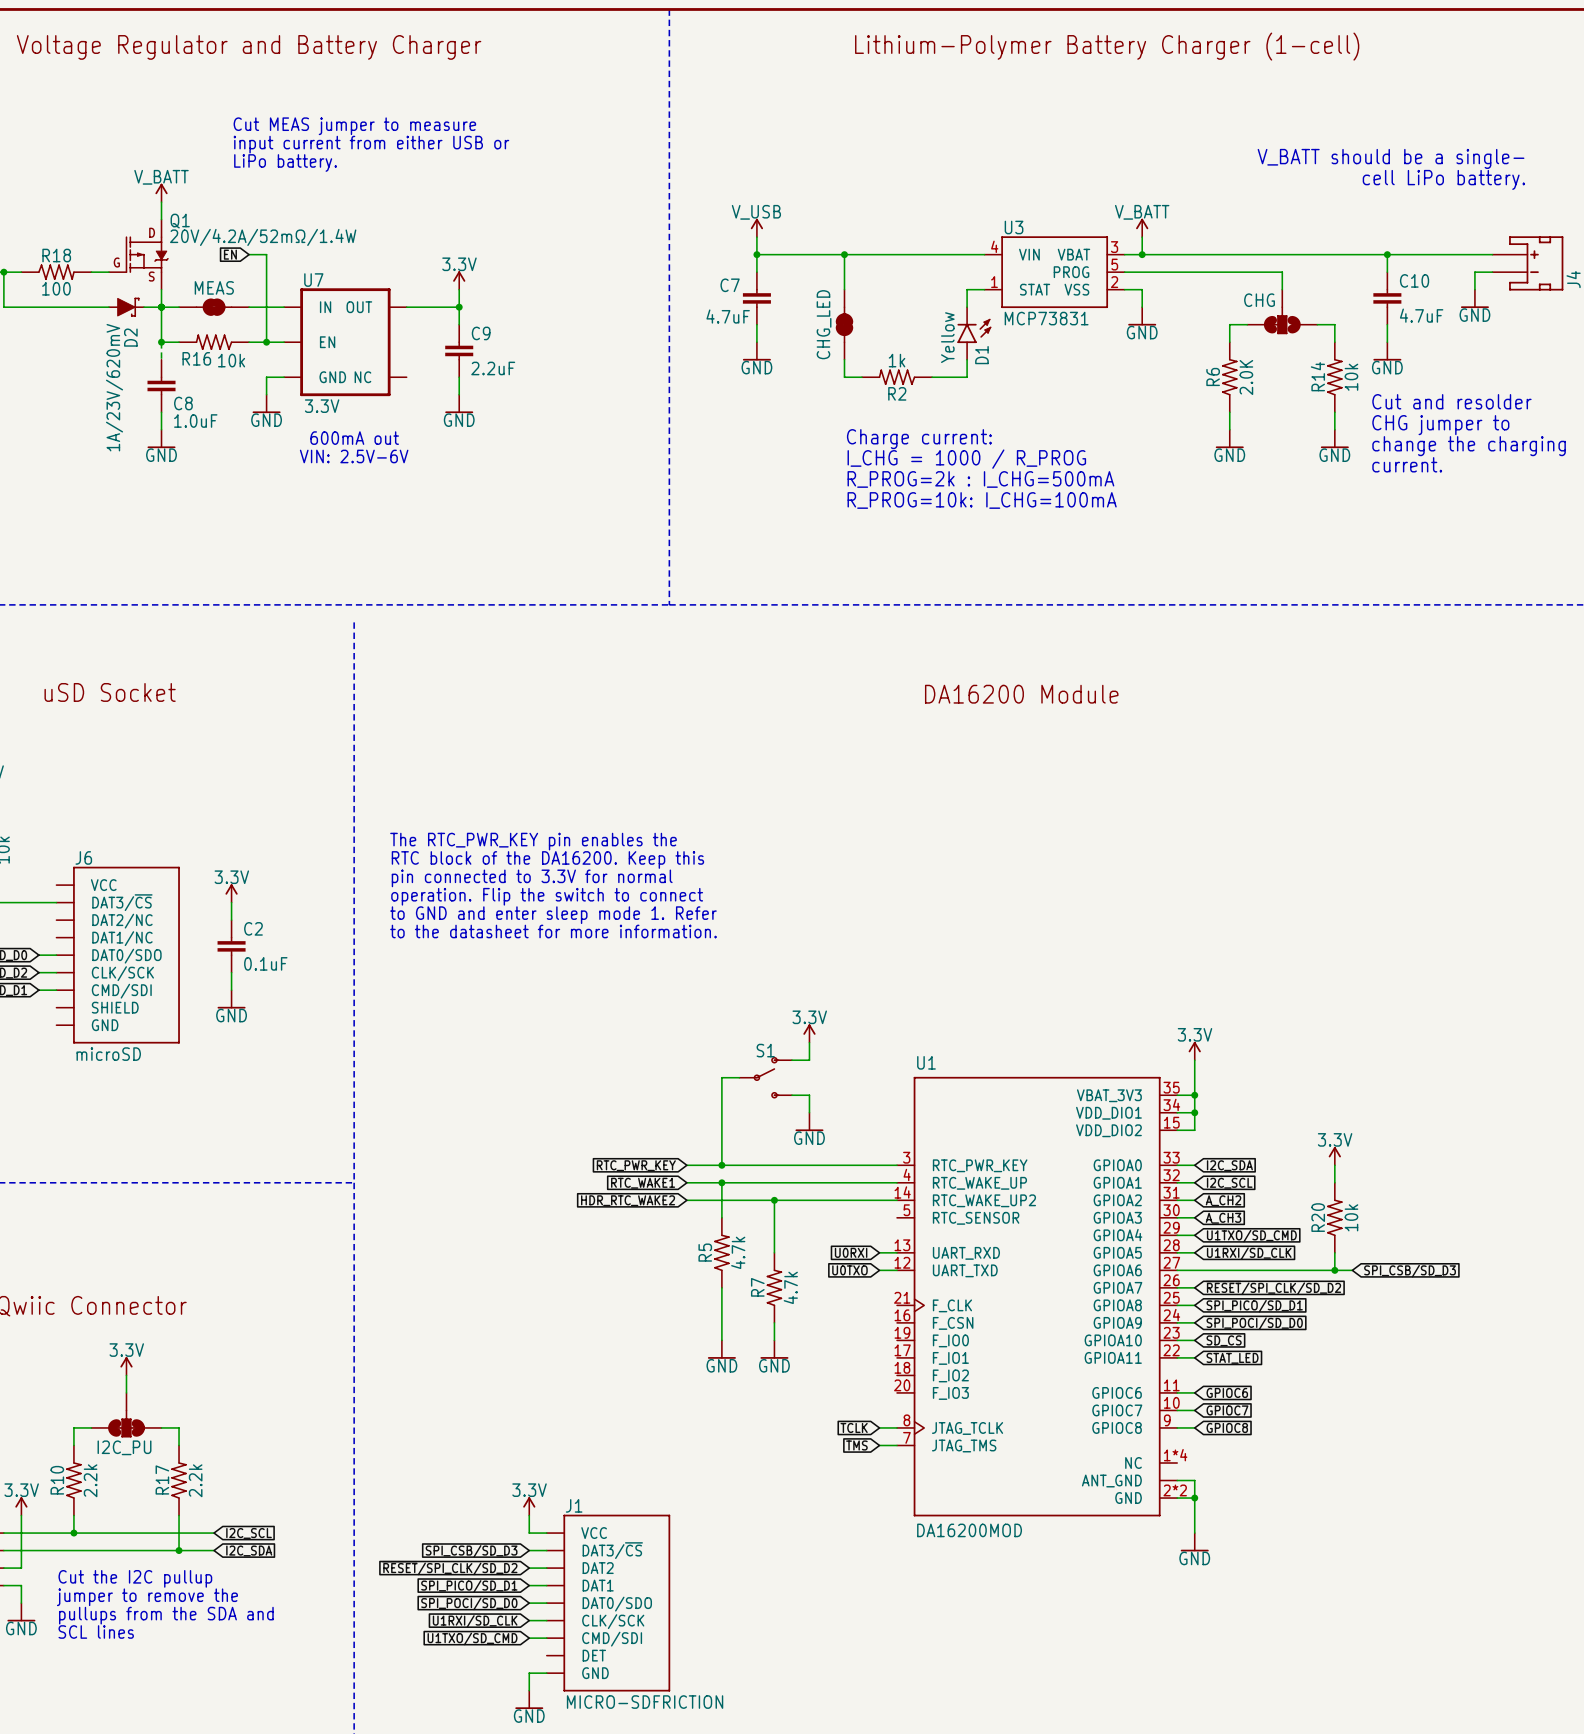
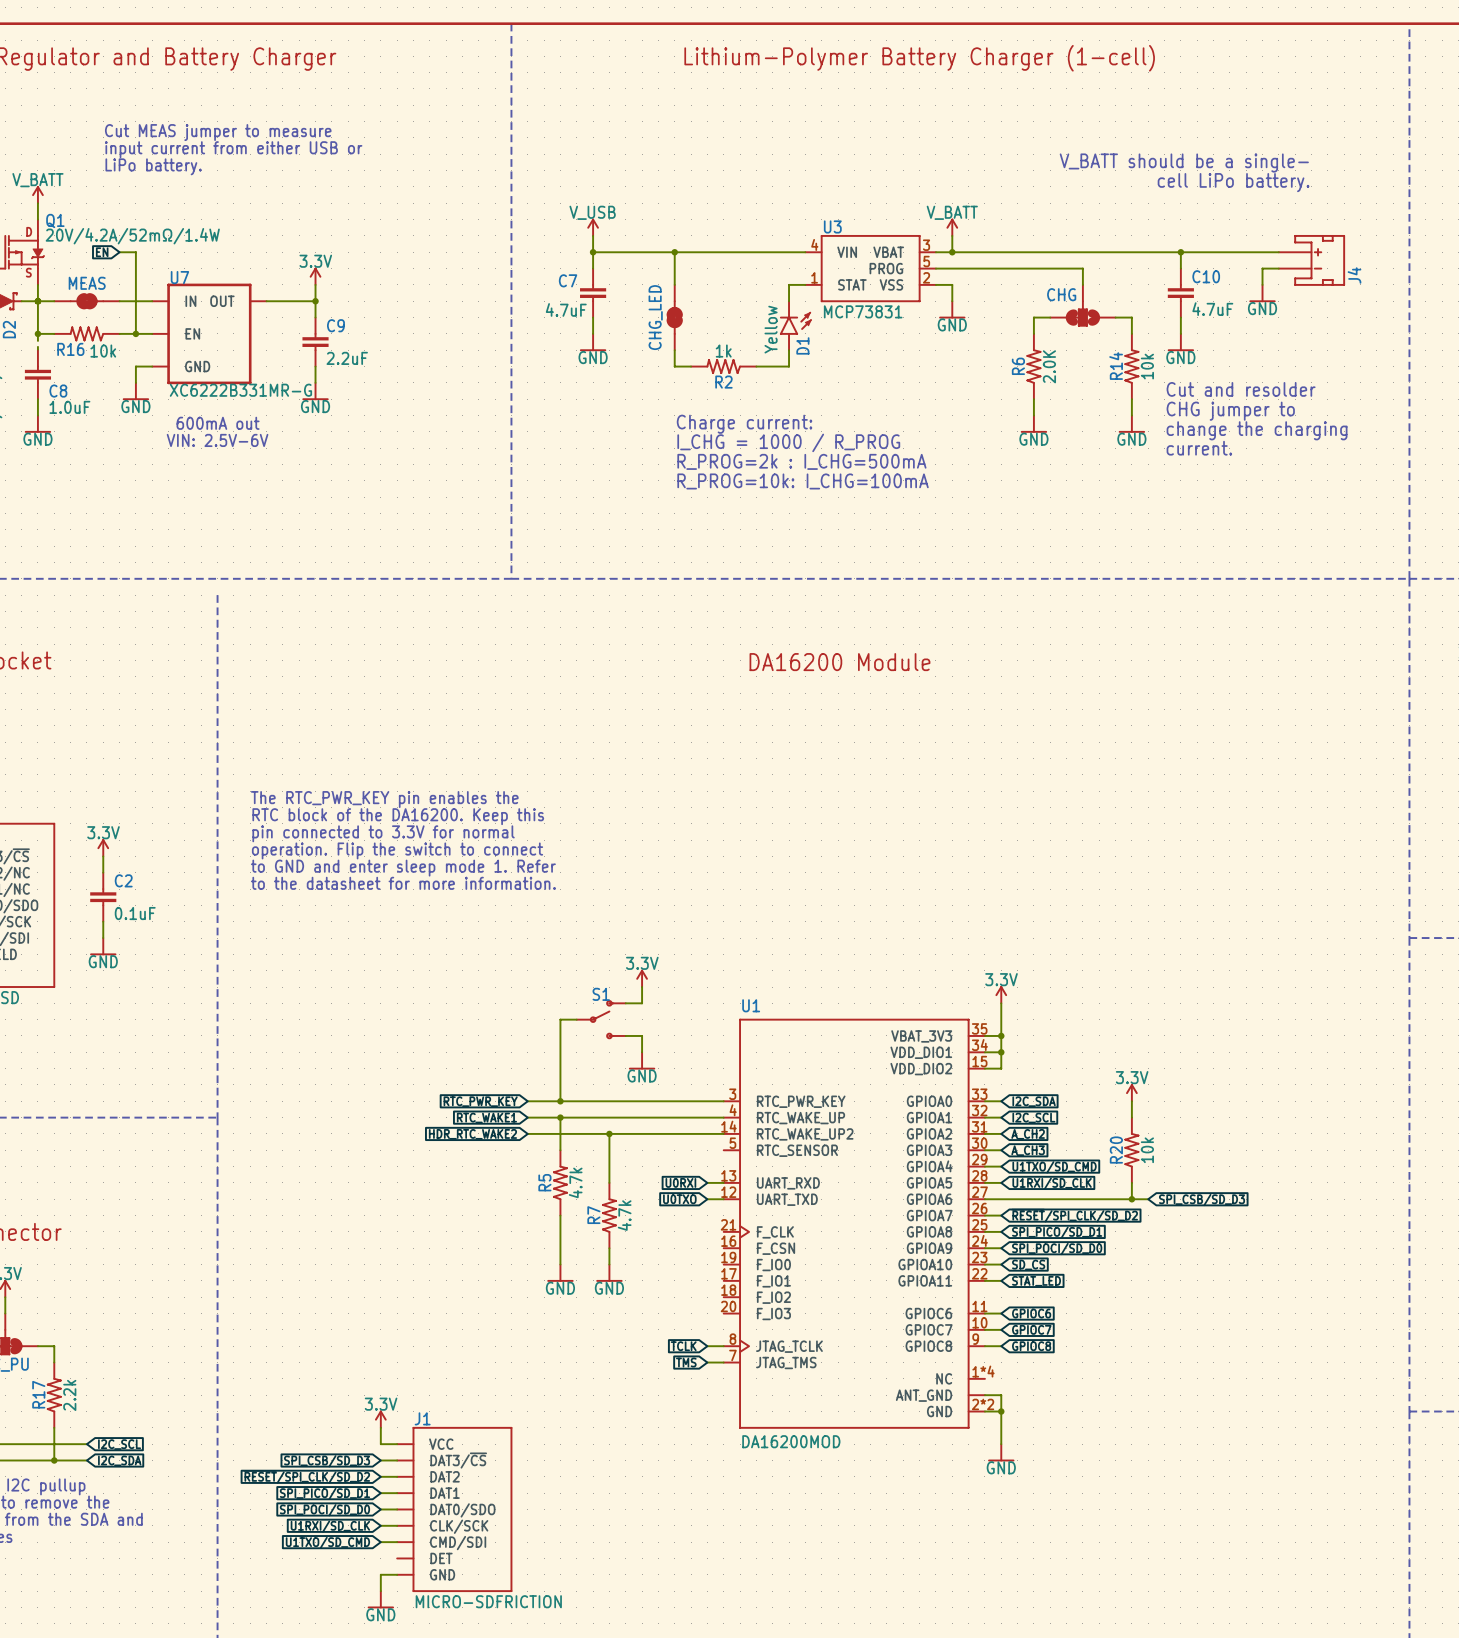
U7 symbol: [284, 288, 407, 397] -> [152, 283, 267, 385]
U7 value: 3.3V (322, 406) -> XC6222B331MR-G (240, 390)

